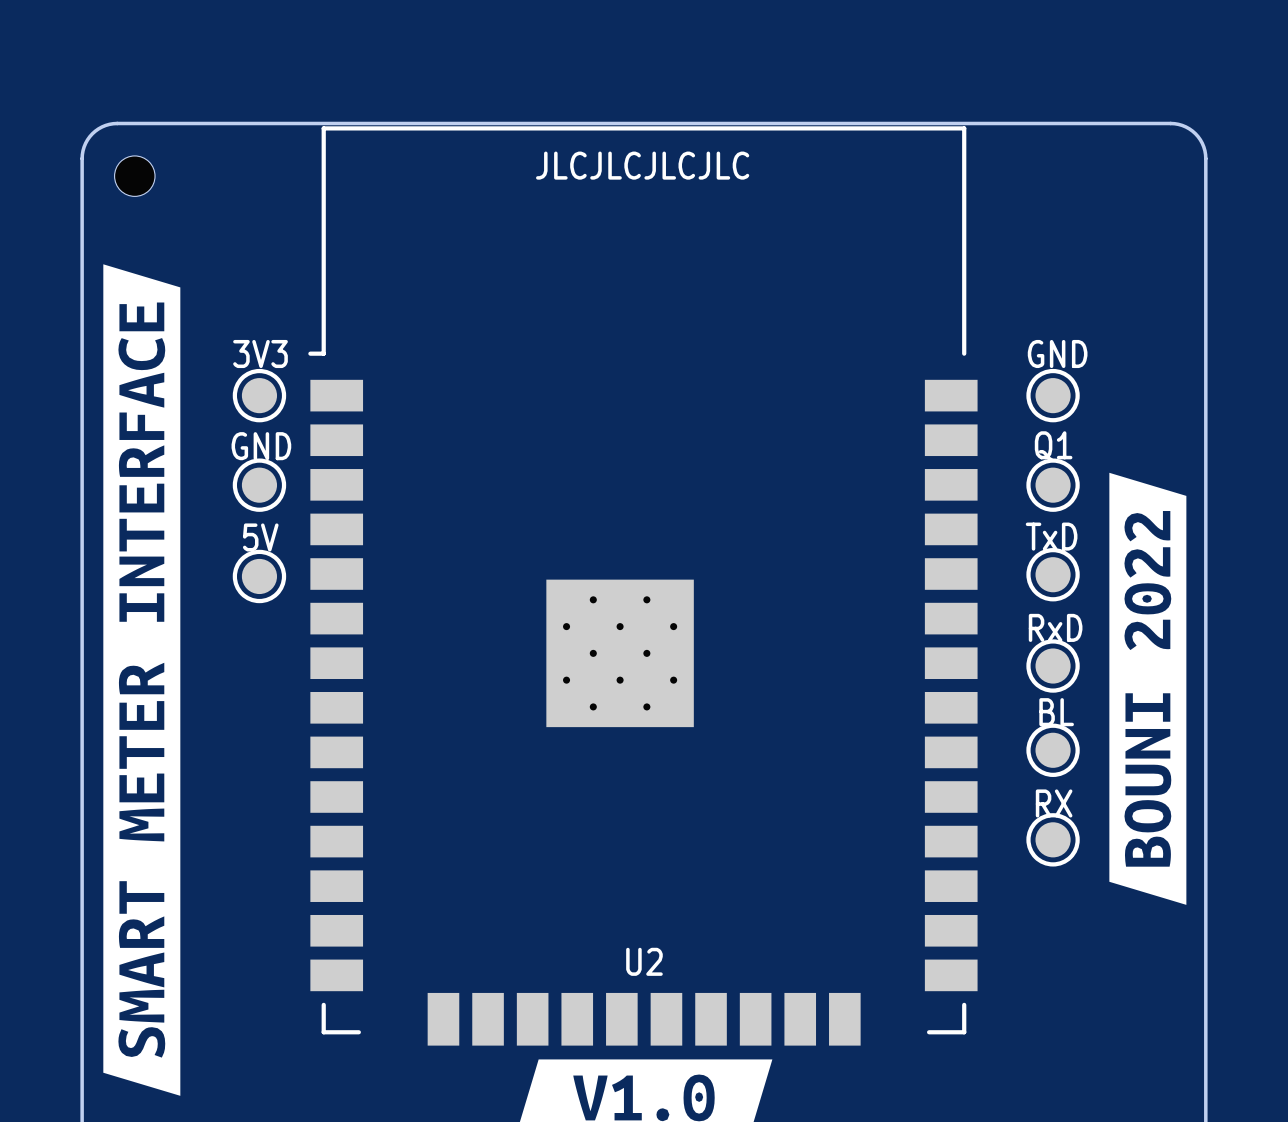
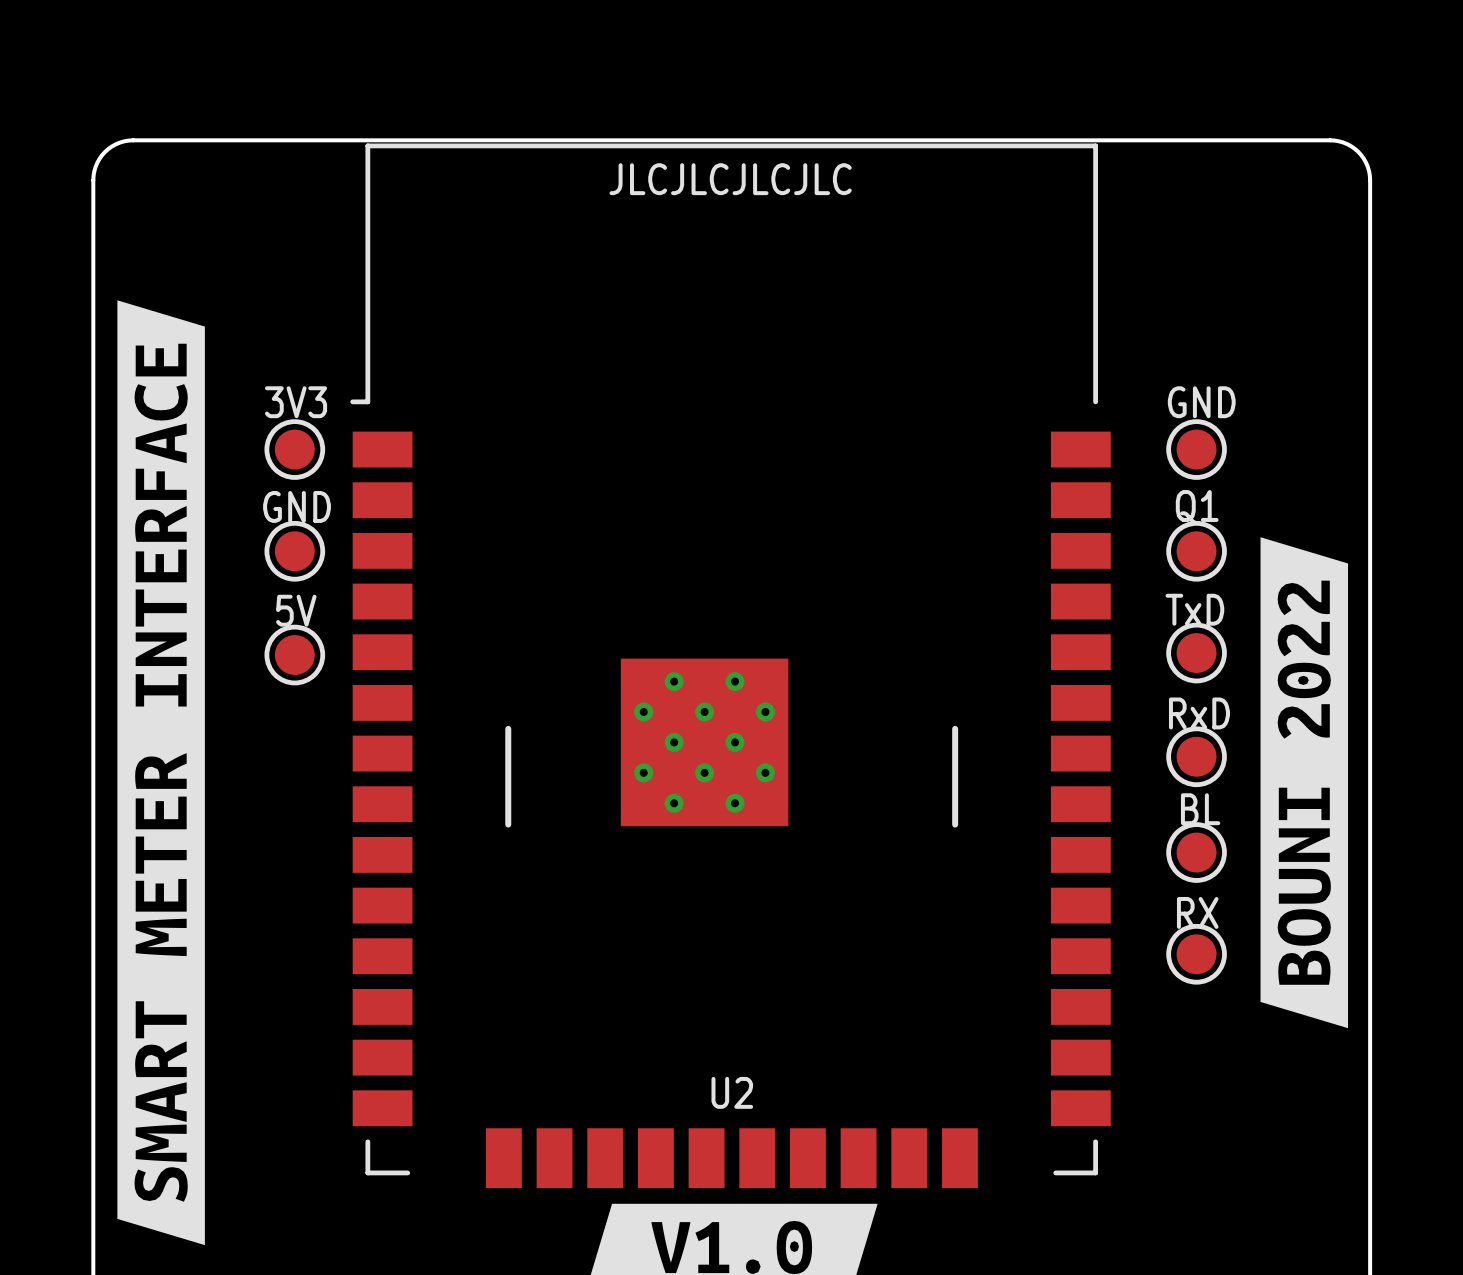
drawing: [536, 151, 750, 180] -> none
text: none -> JLCJLCJLCJLC (730, 179)
part: (134, 176) -> none
line: none -> (508, 728) (508, 824)
line: none -> (955, 728) (955, 824)

